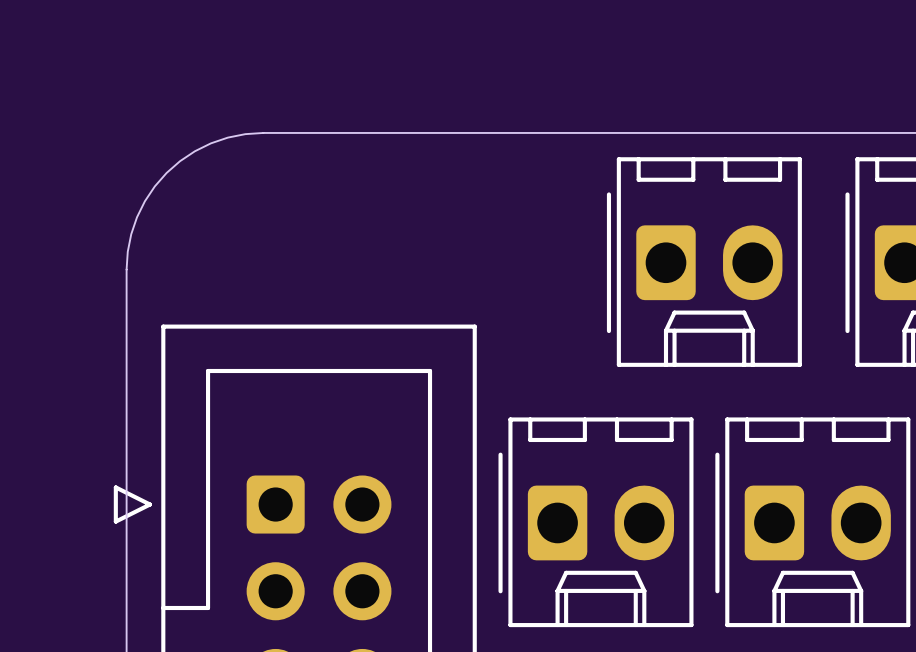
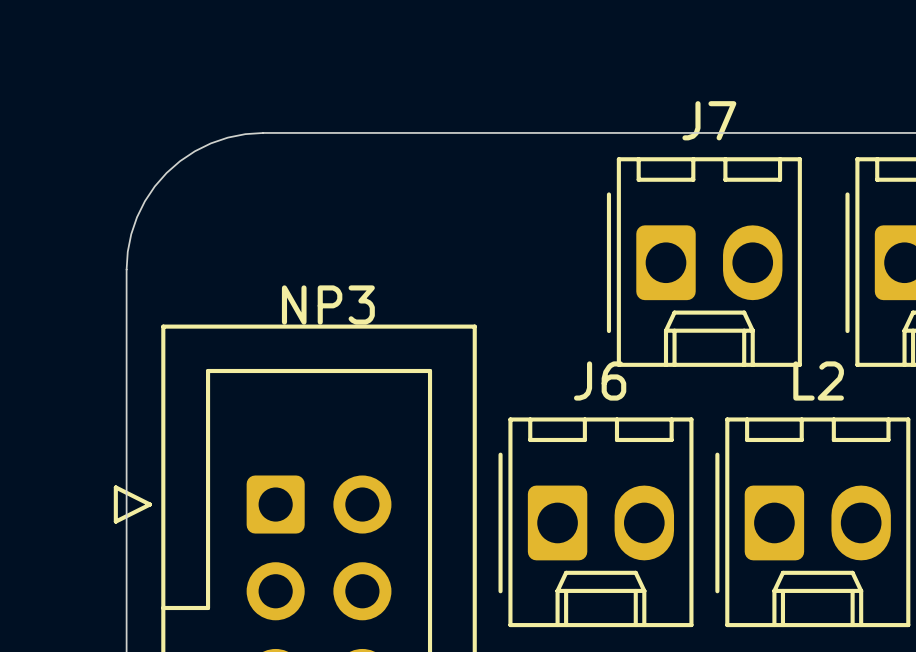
J7 name: none -> J7 (709, 120)
NP3 name: none -> NP3 (328, 305)
L2 name: none -> L2 (818, 380)
J6 name: none -> J6 (600, 380)

